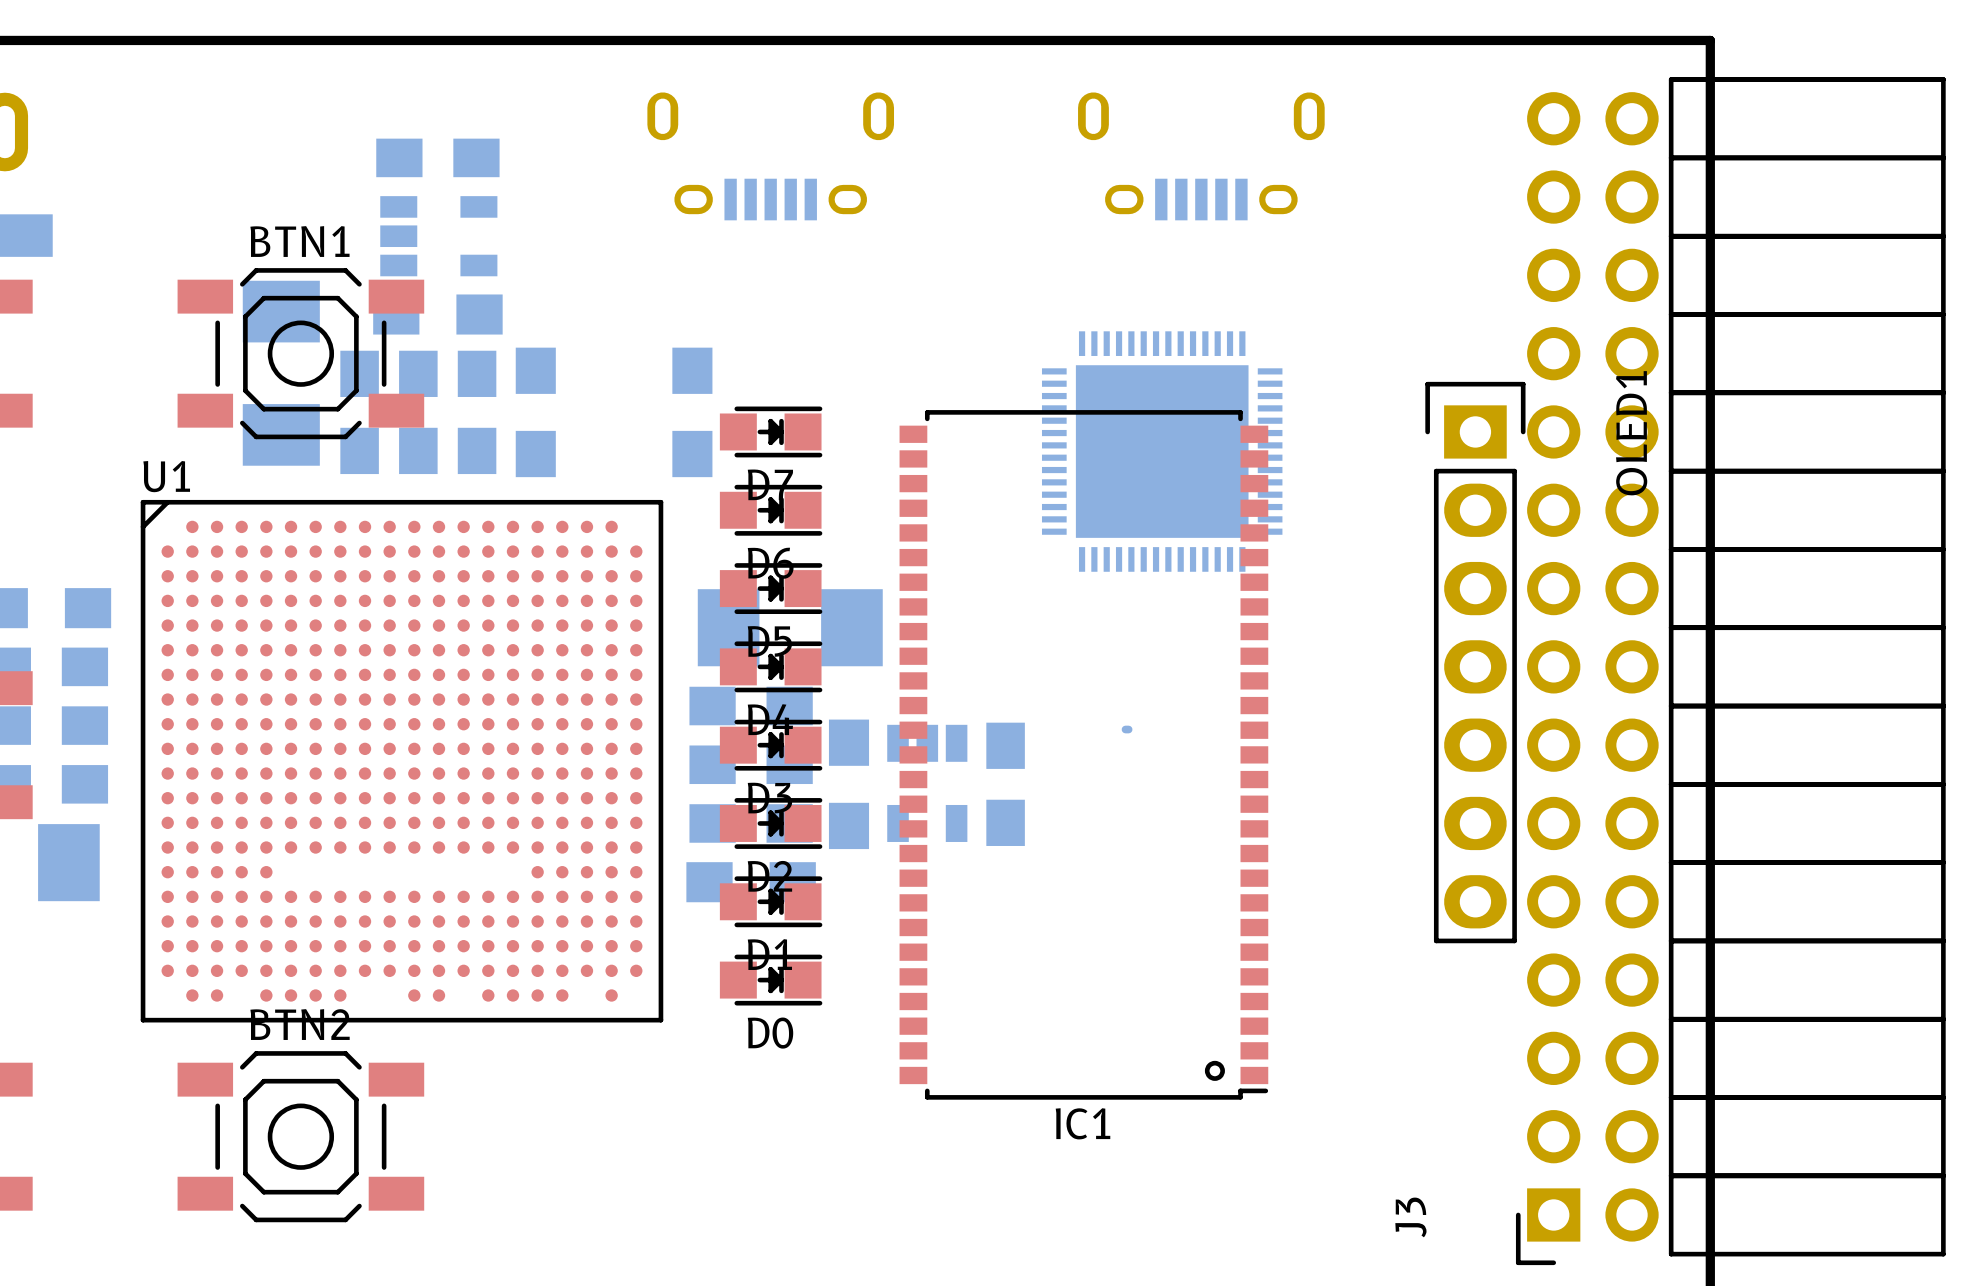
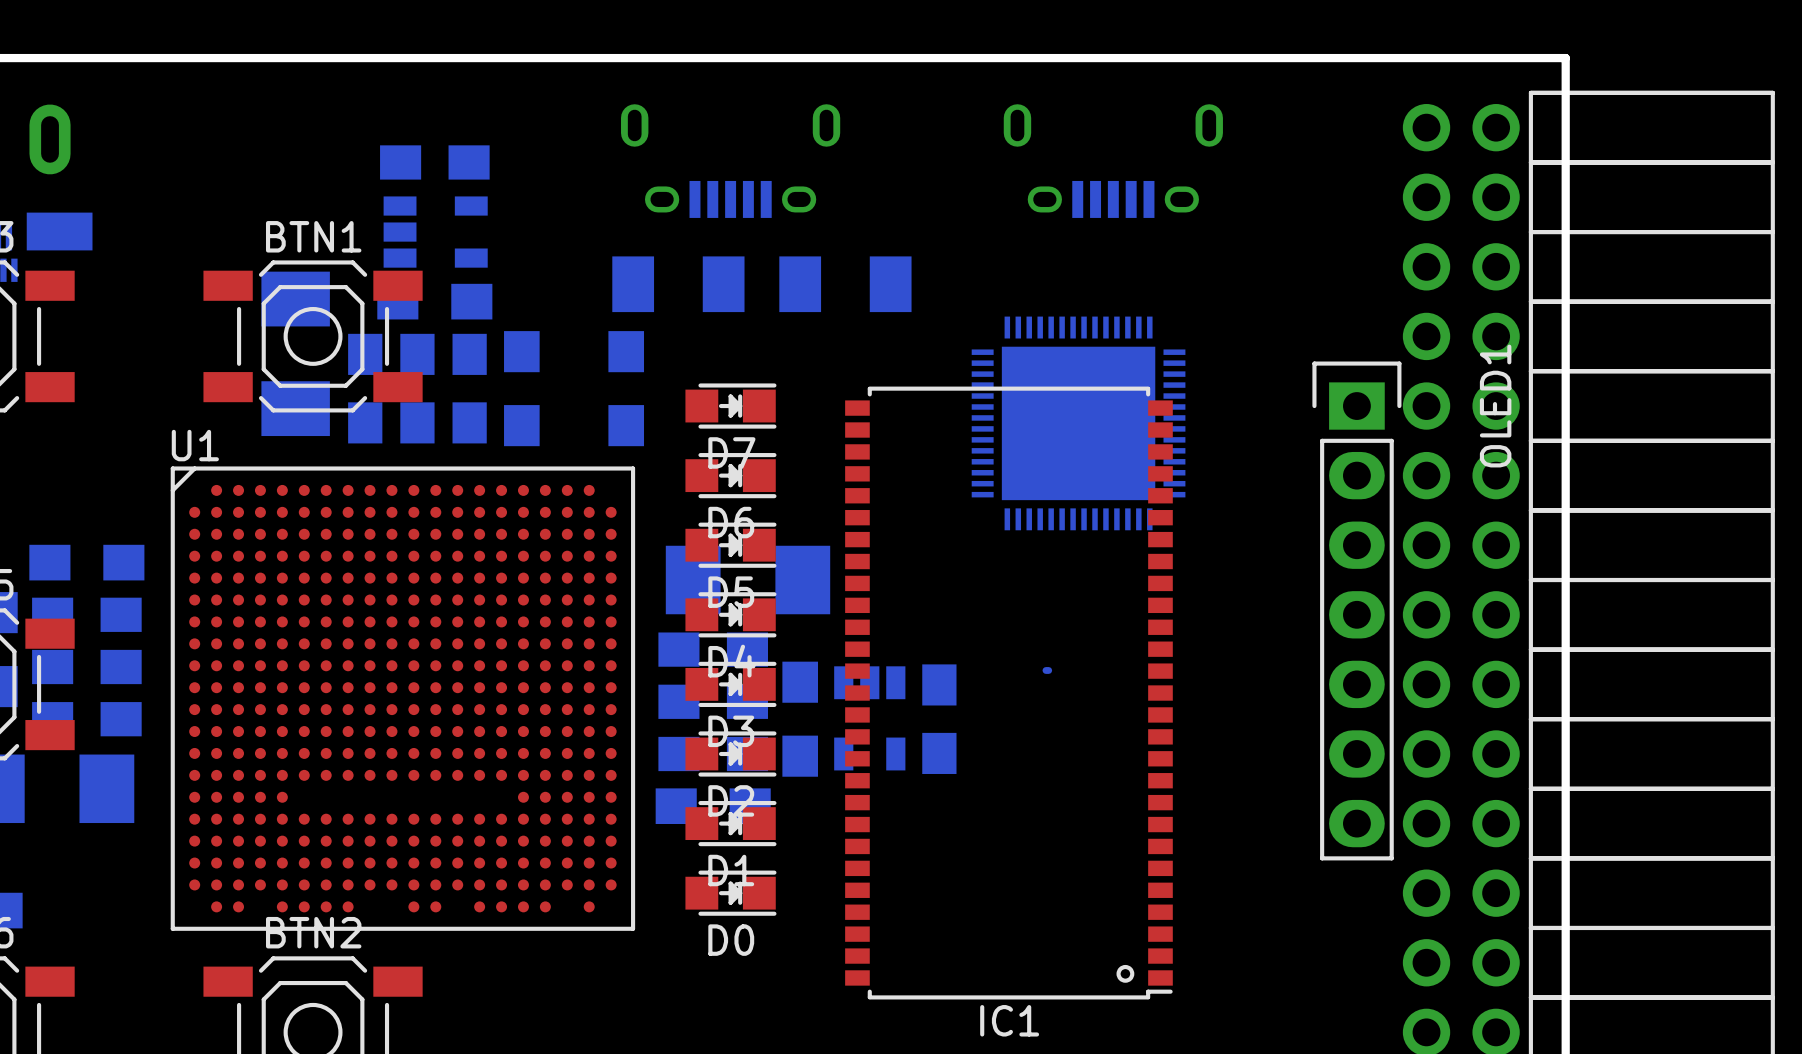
part: none -> (678, 284)
part: none -> (845, 284)
part position: (692, 412) -> (626, 388)

